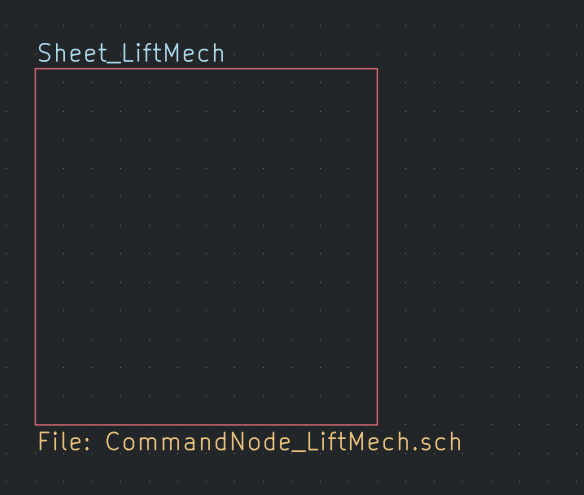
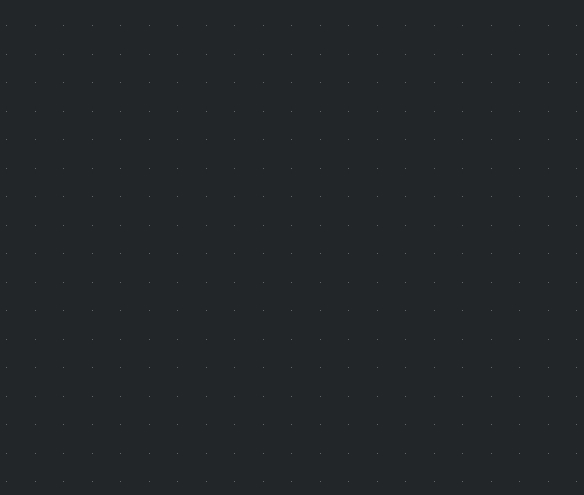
sheet Sheet_LiftMech: File: CommandNode_LiftMech.sch (206, 246) -> none

